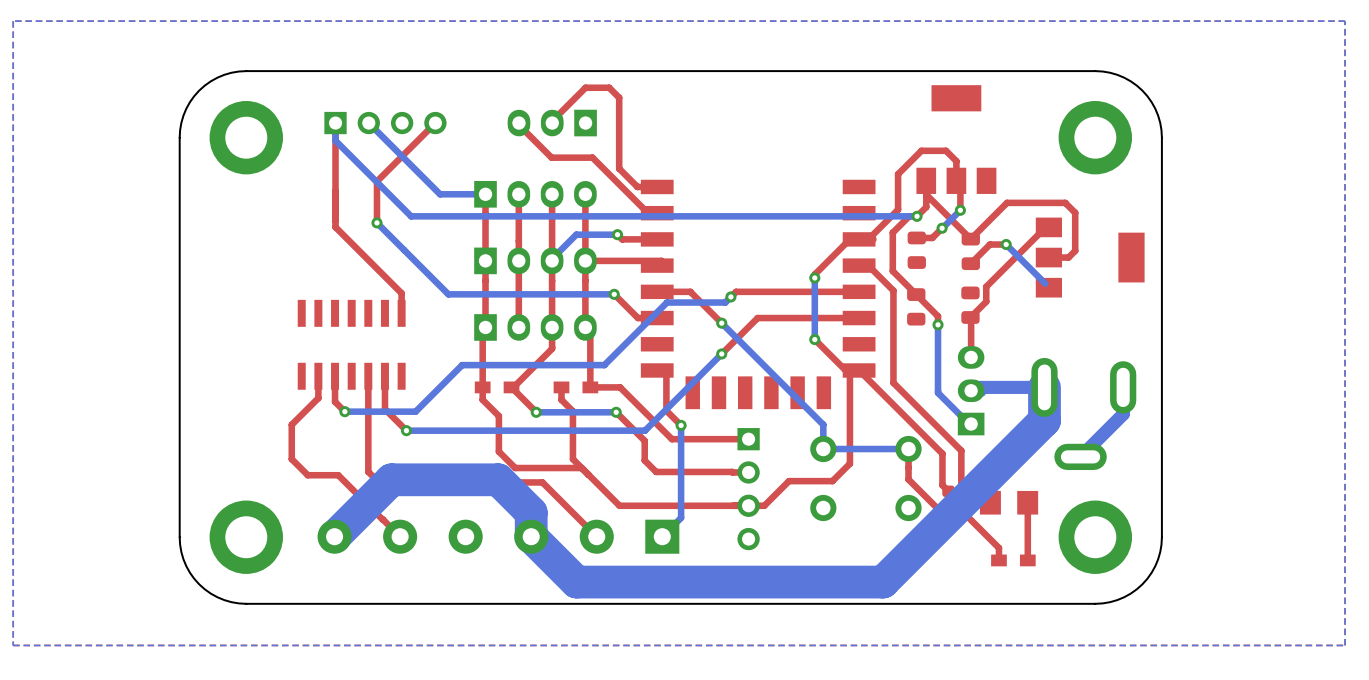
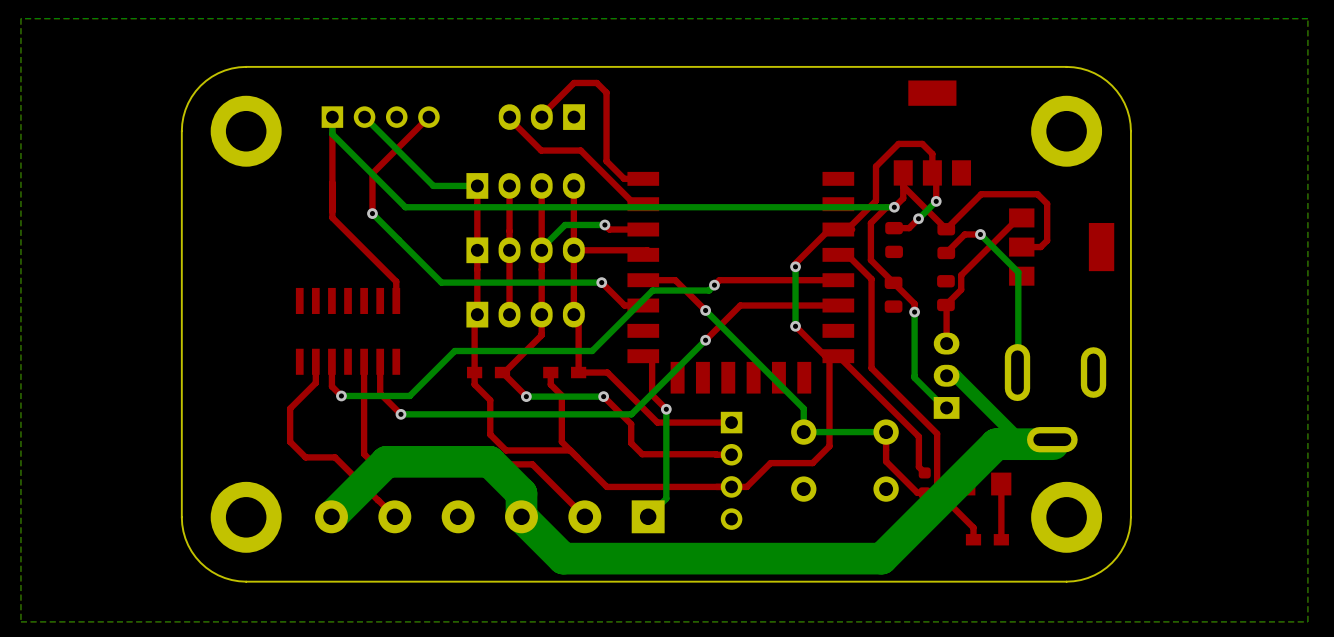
bottom track: none -> (1018, 272) (1018, 377)
bottom track: (1123, 387) (1123, 414) (1080, 456) -> none
bottom track: (971, 390) (974, 387) (1044, 387) (1044, 420) (883, 582) (576, 582) (574, 579) -> (955, 375) (1023, 444) (1053, 444) (996, 444) (881, 558) (563, 558)

